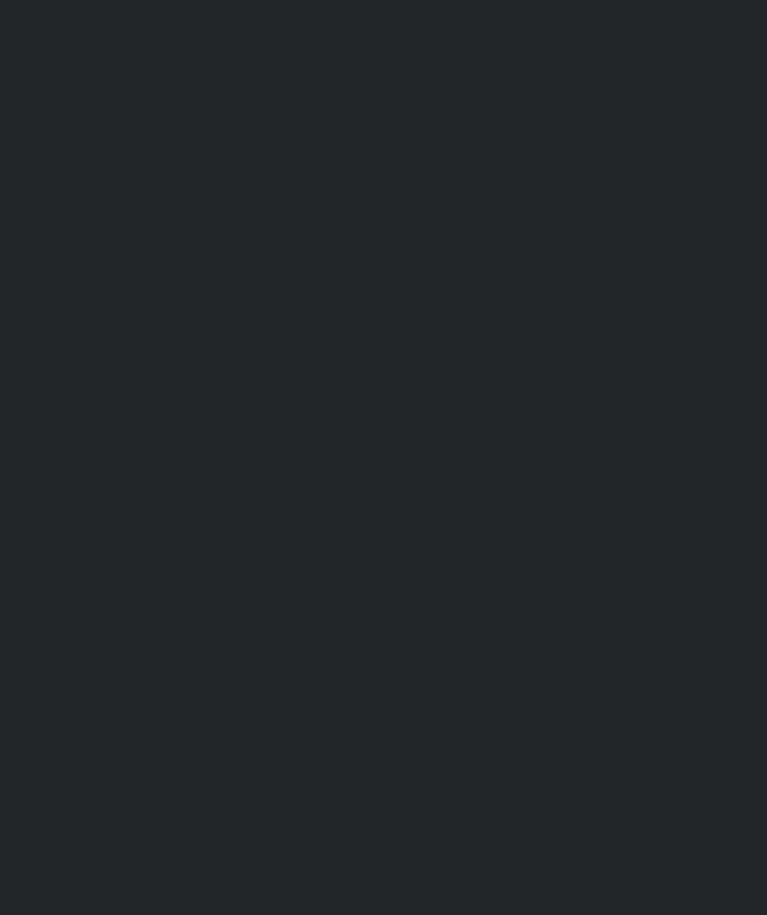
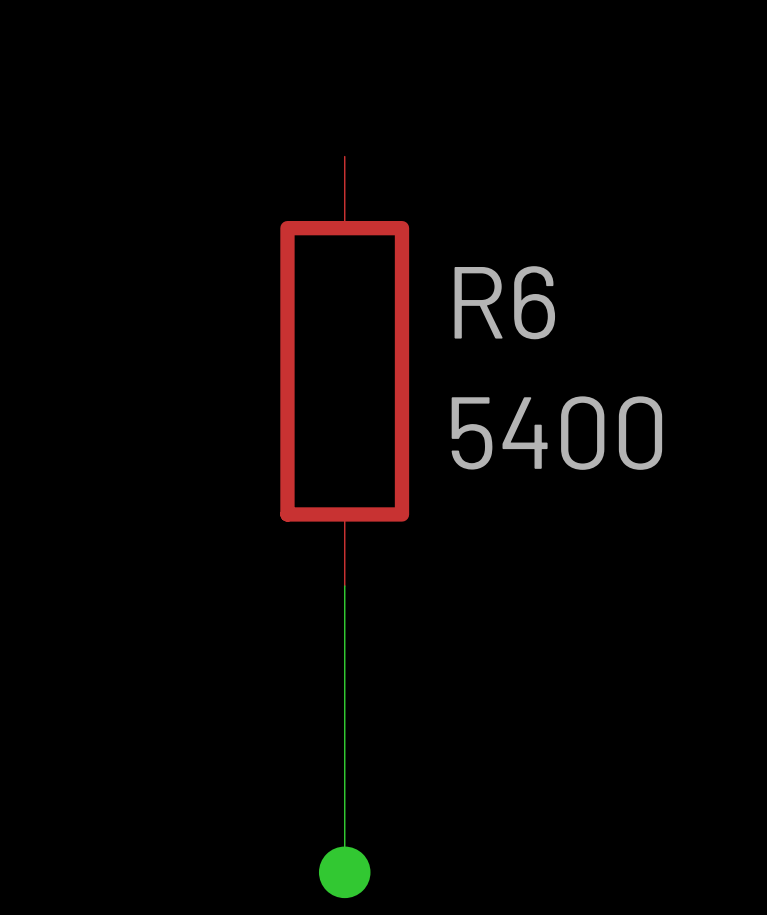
R6: none -> 5400 (344, 371)
wire: none -> (344, 586) (344, 872)
junction: none -> (344, 872)

